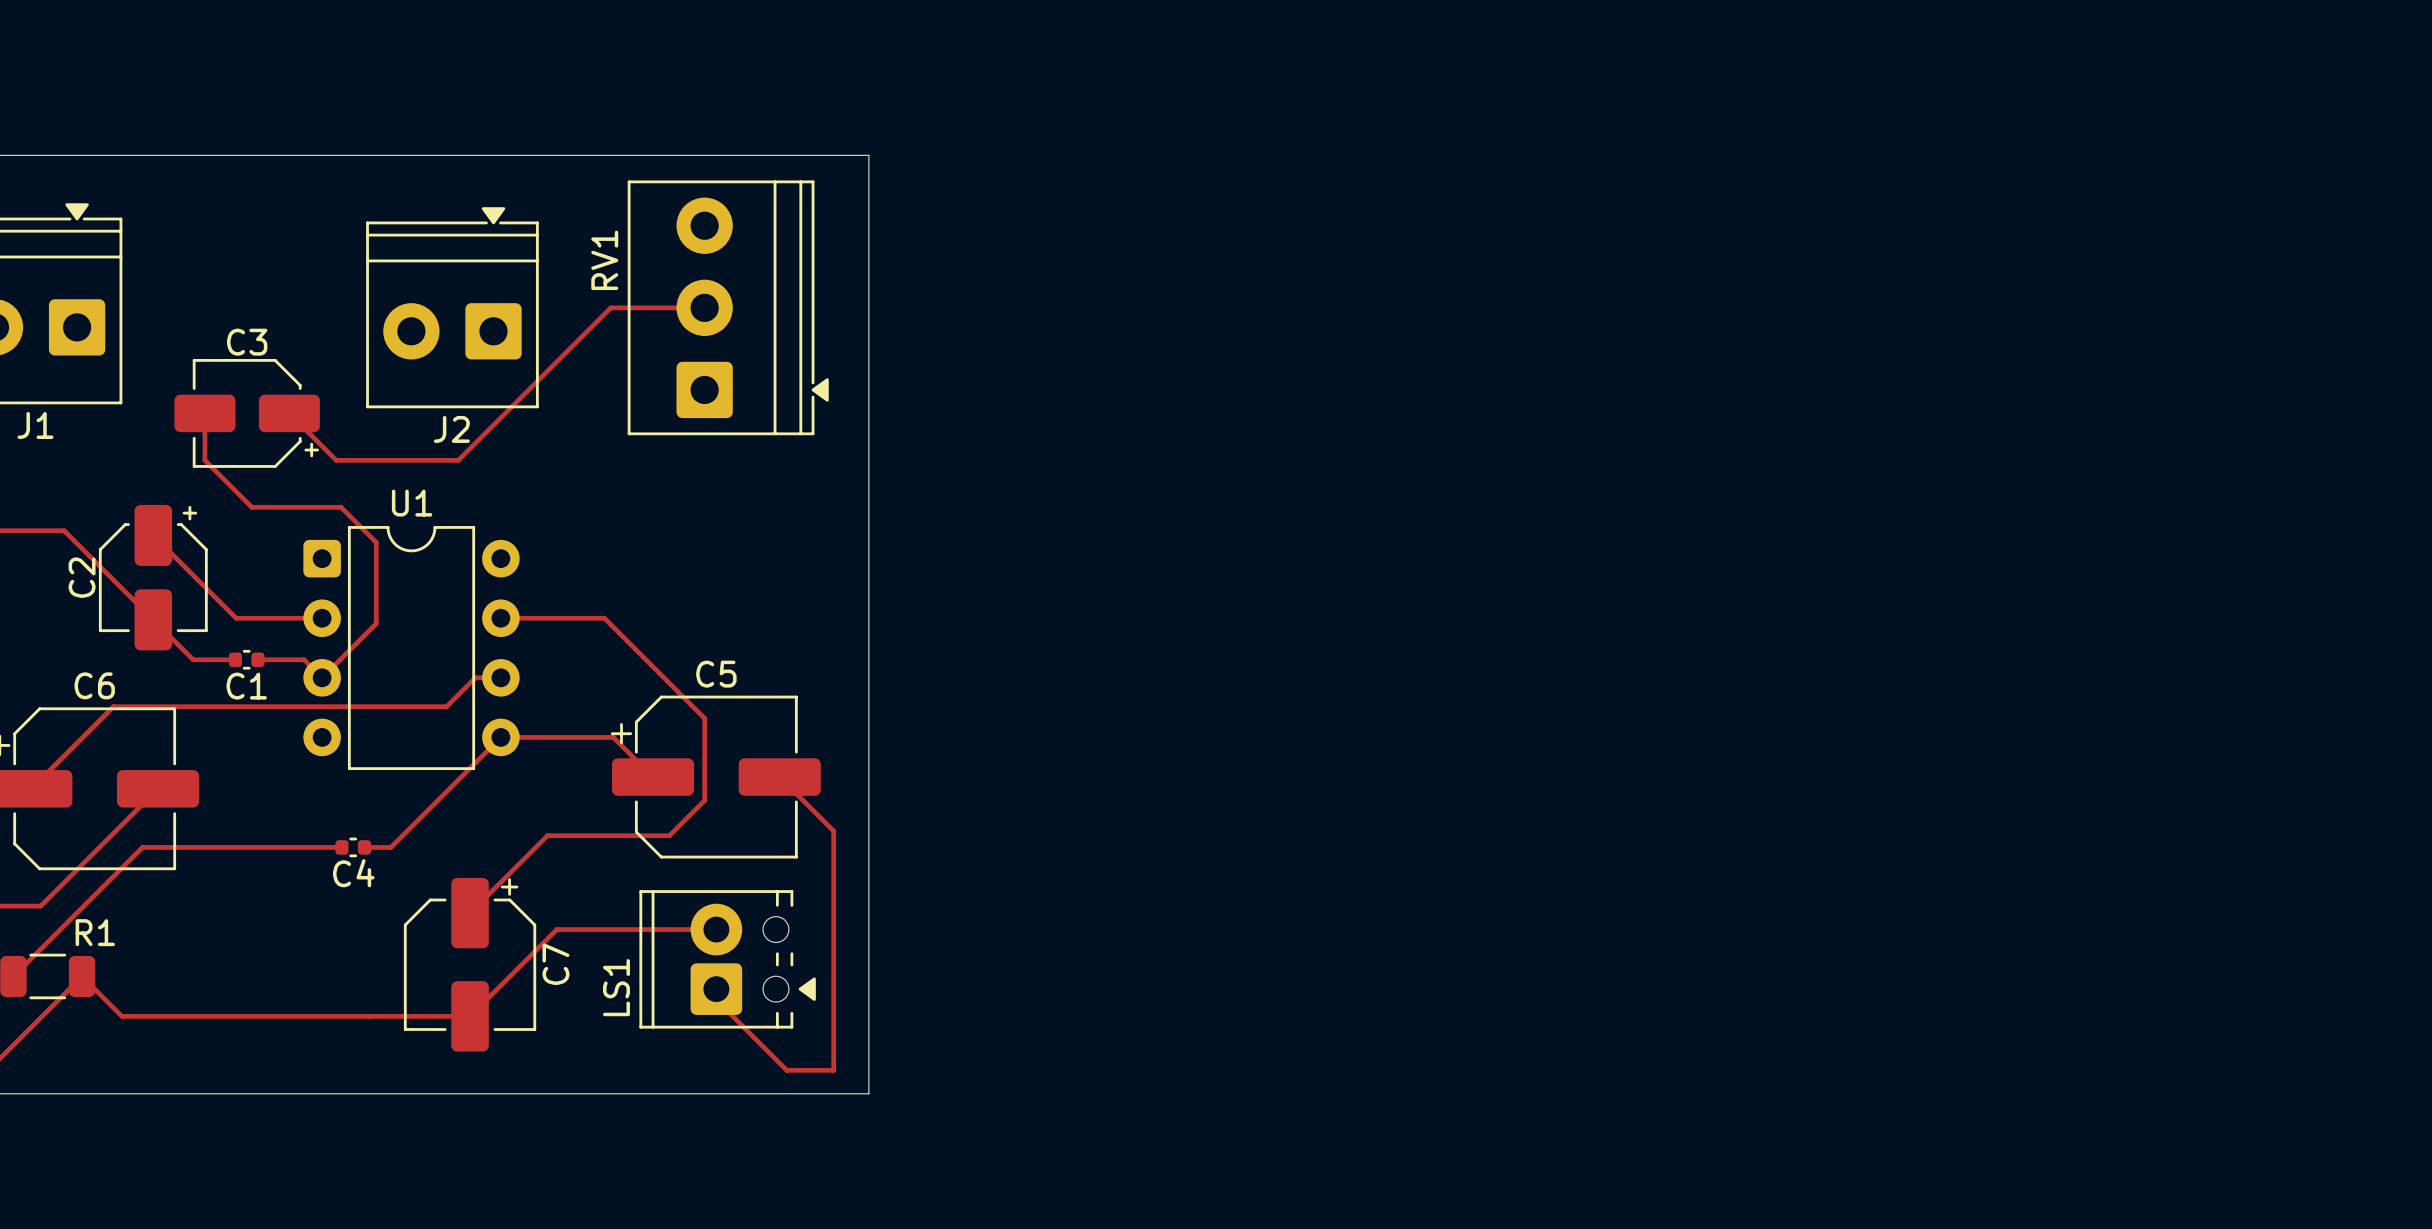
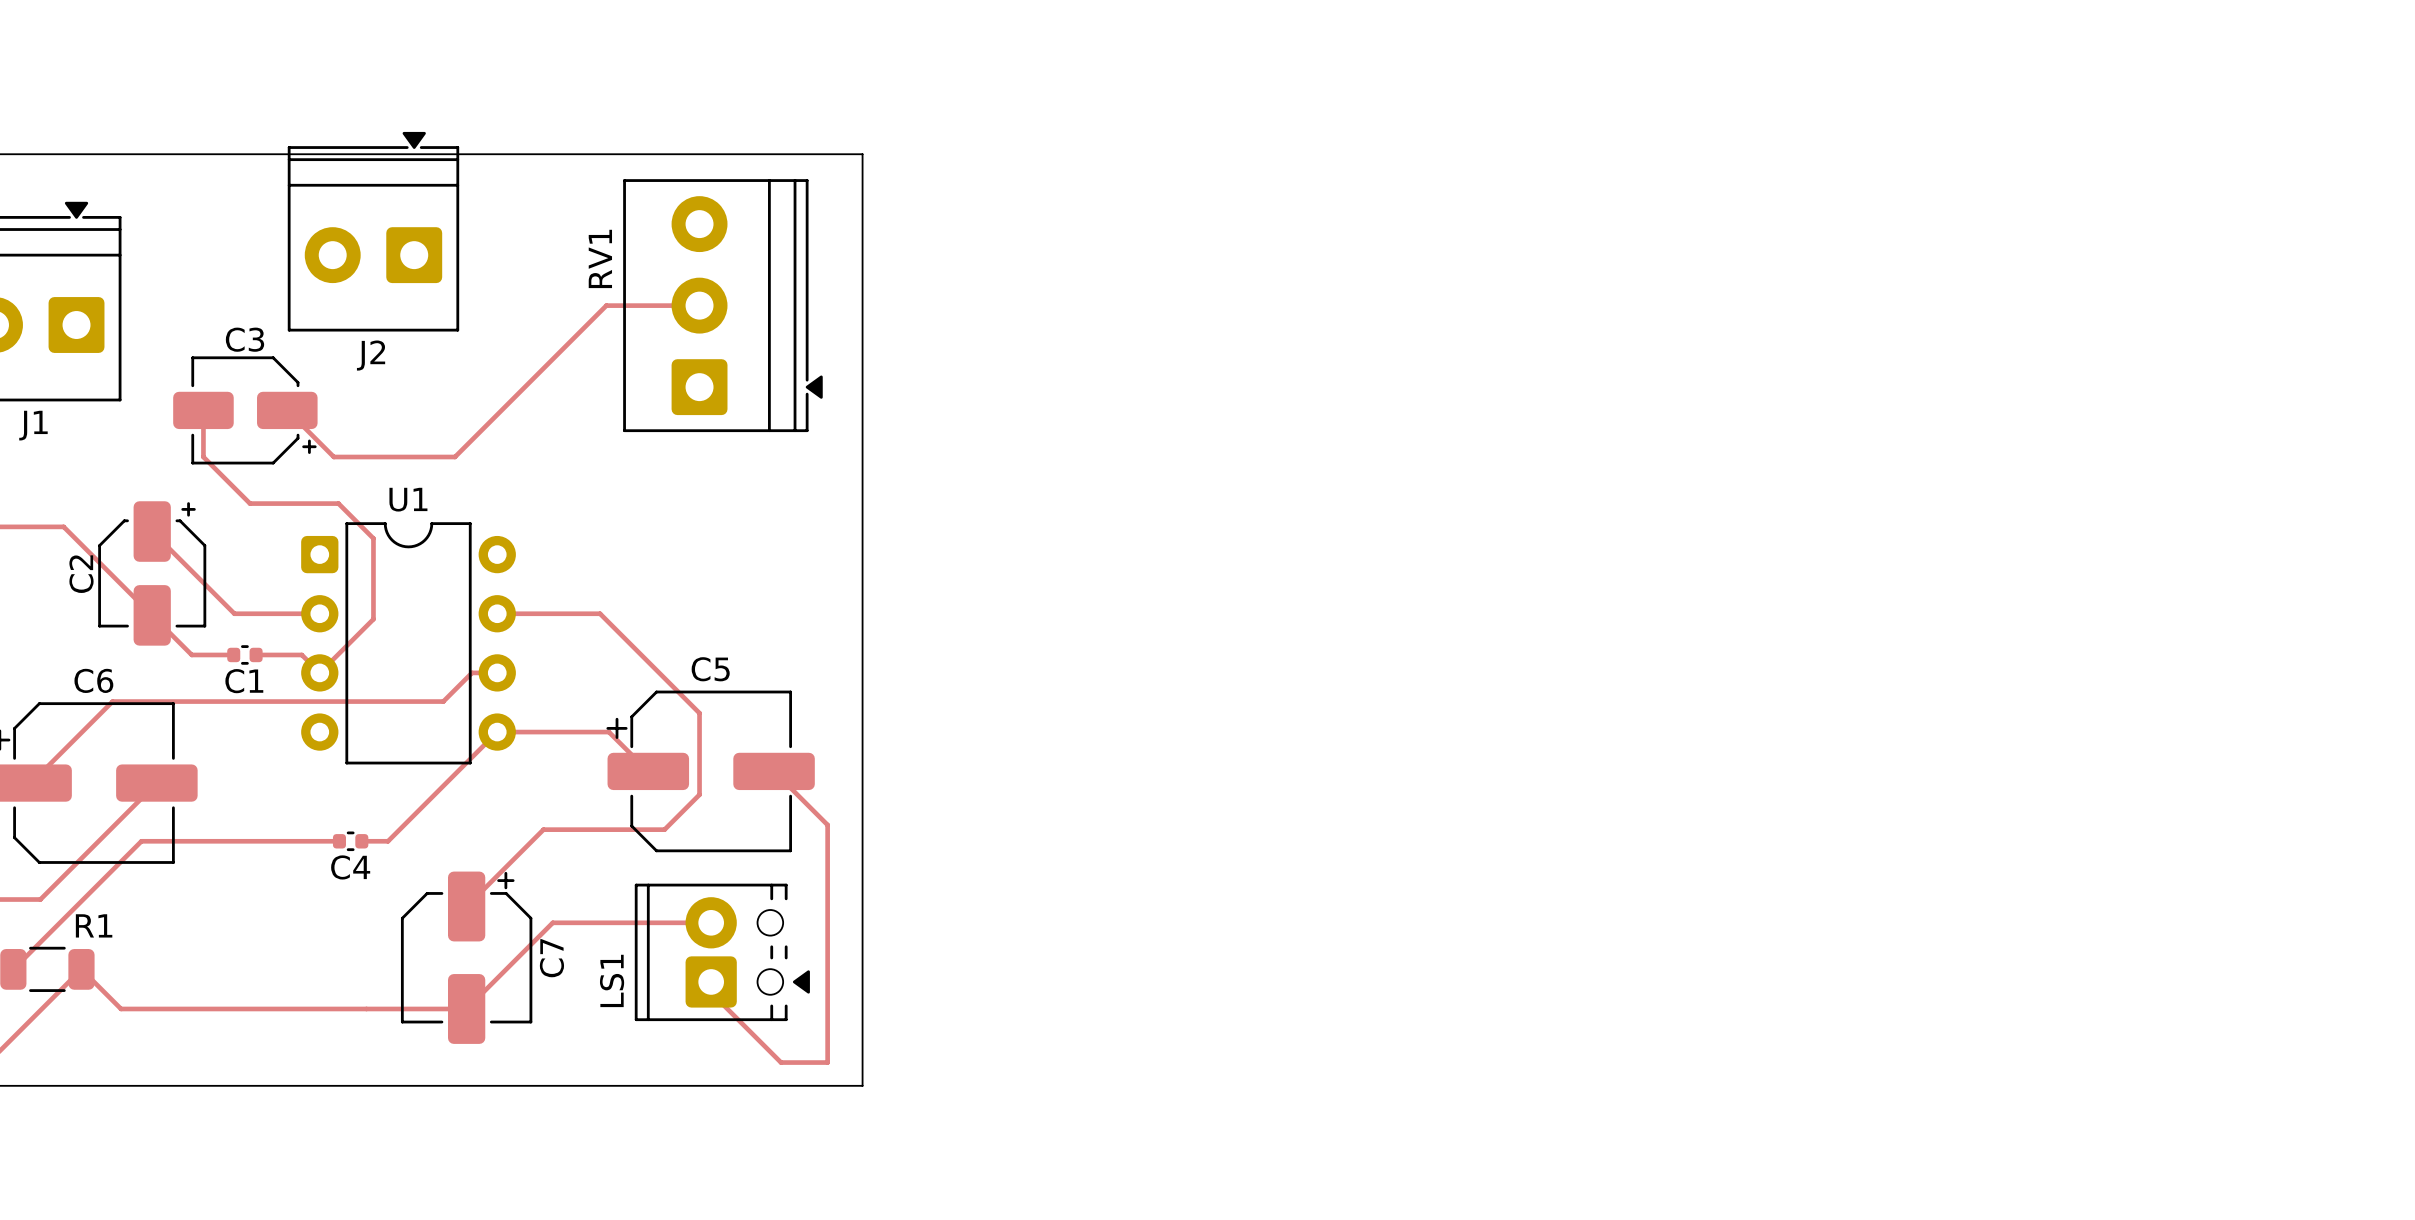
J2 position: (452, 307) -> (373, 231)

